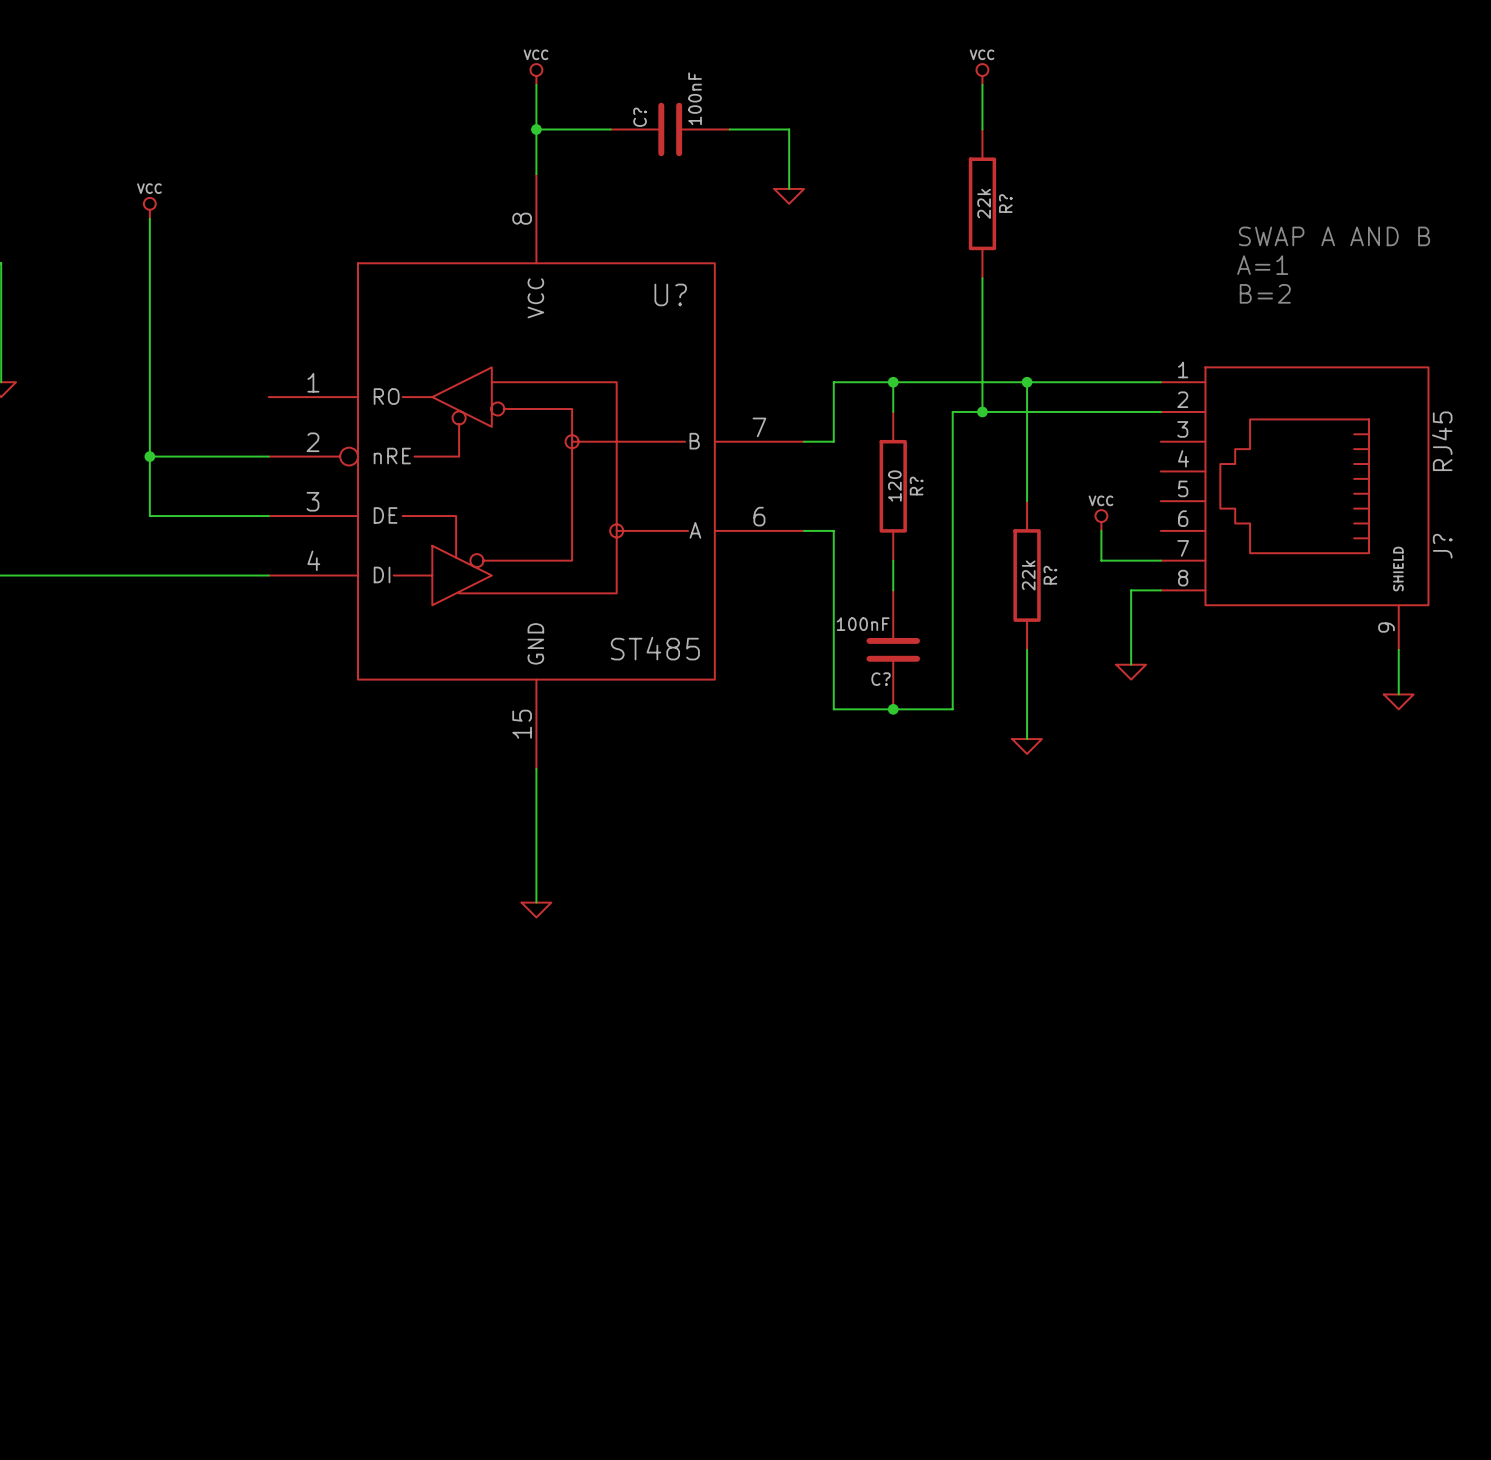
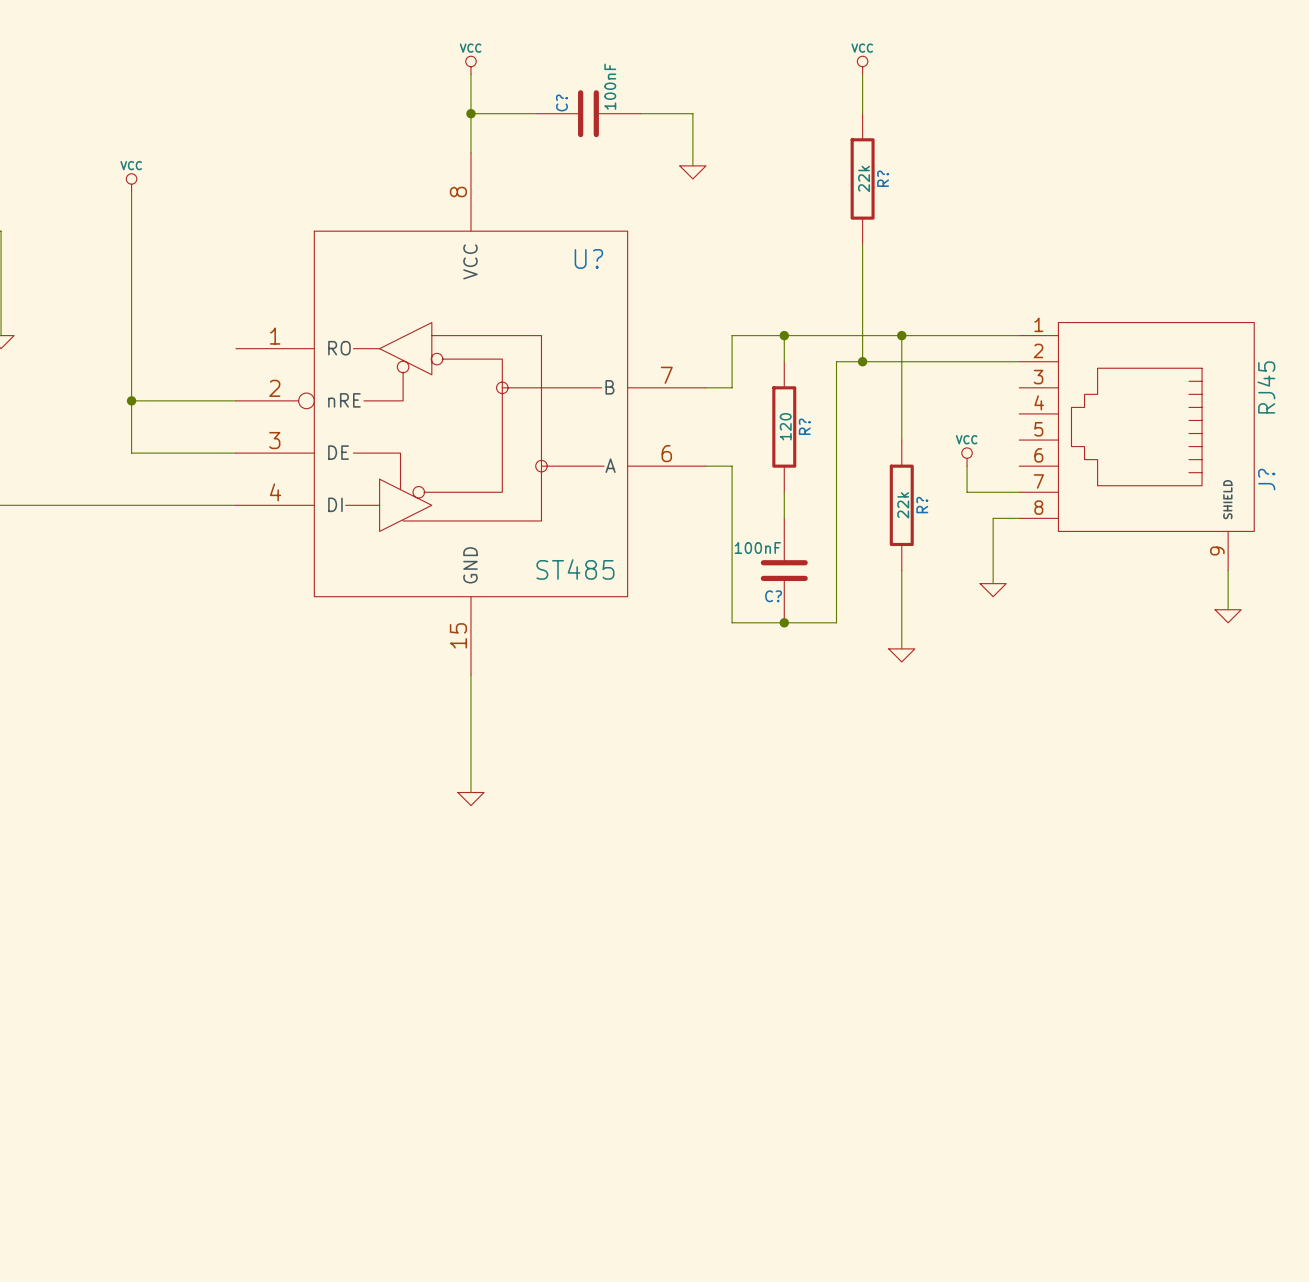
text: SWAP A AND B (1334, 236) -> none
text: A=1 (1262, 265) -> none
text: B=2 (1265, 293) -> none

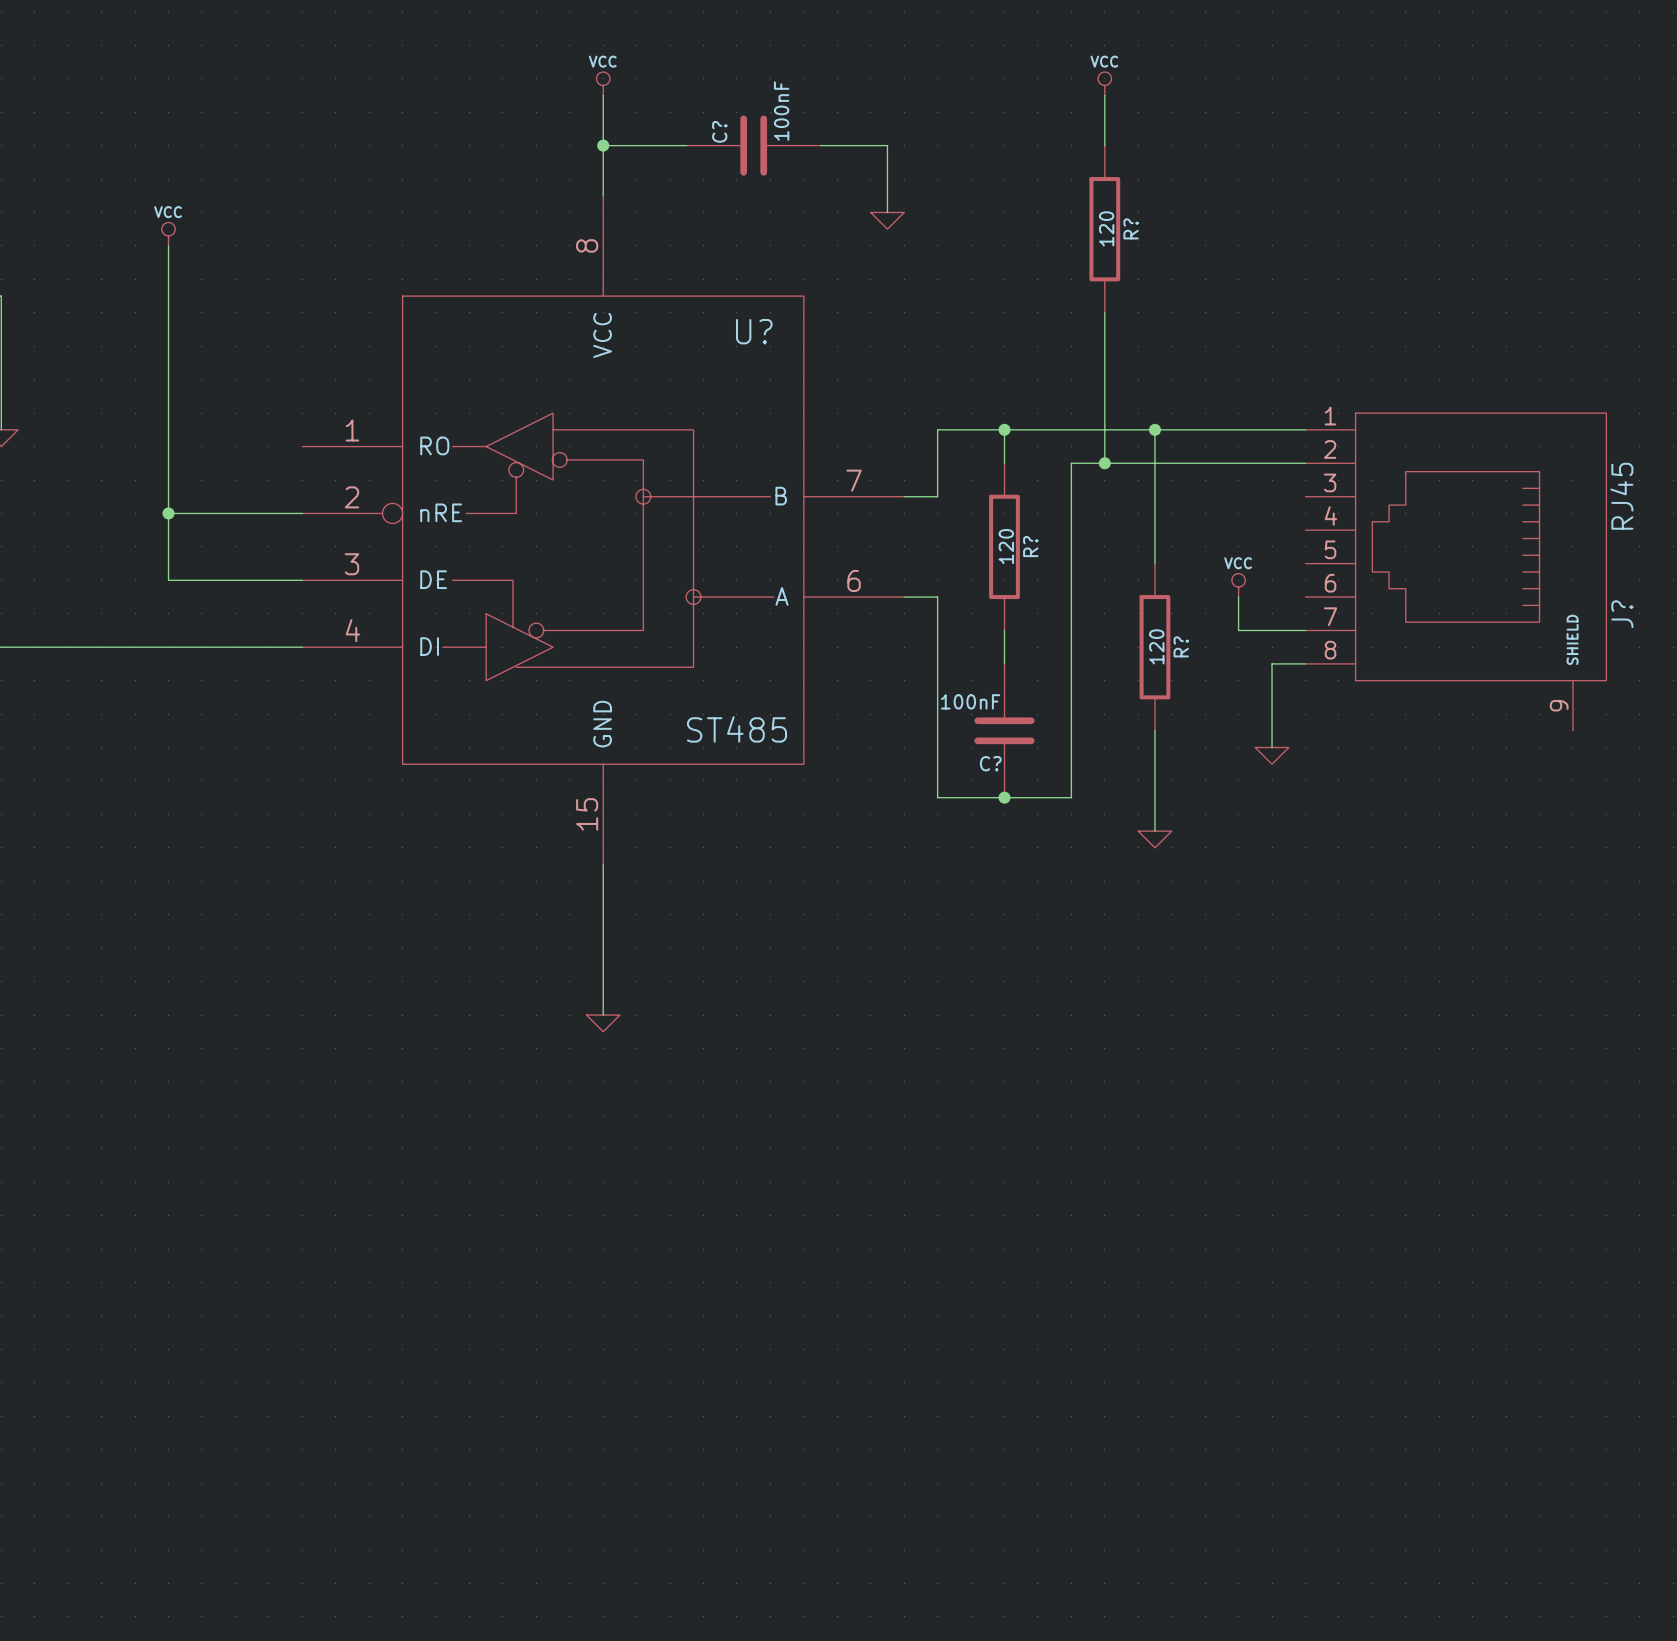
R? value: 22k (864, 178) -> 120 (1106, 228)
R? value: 22k (903, 505) -> 120 (1156, 646)
wire: (1228, 570) (1228, 609) -> none
power symbol: (1228, 616) -> none

